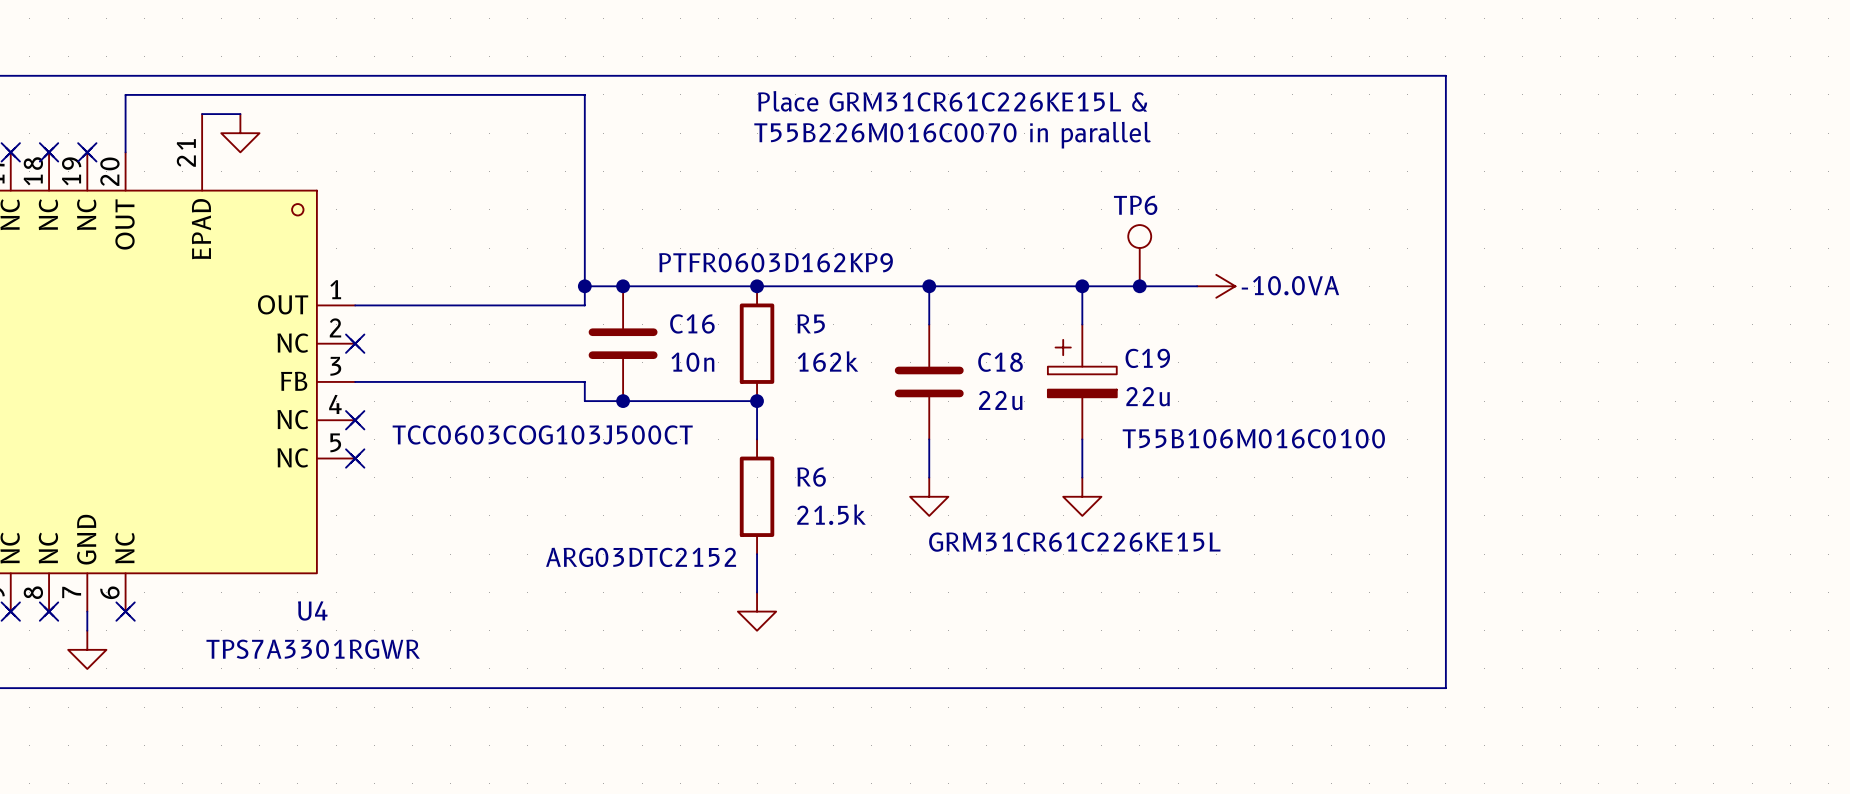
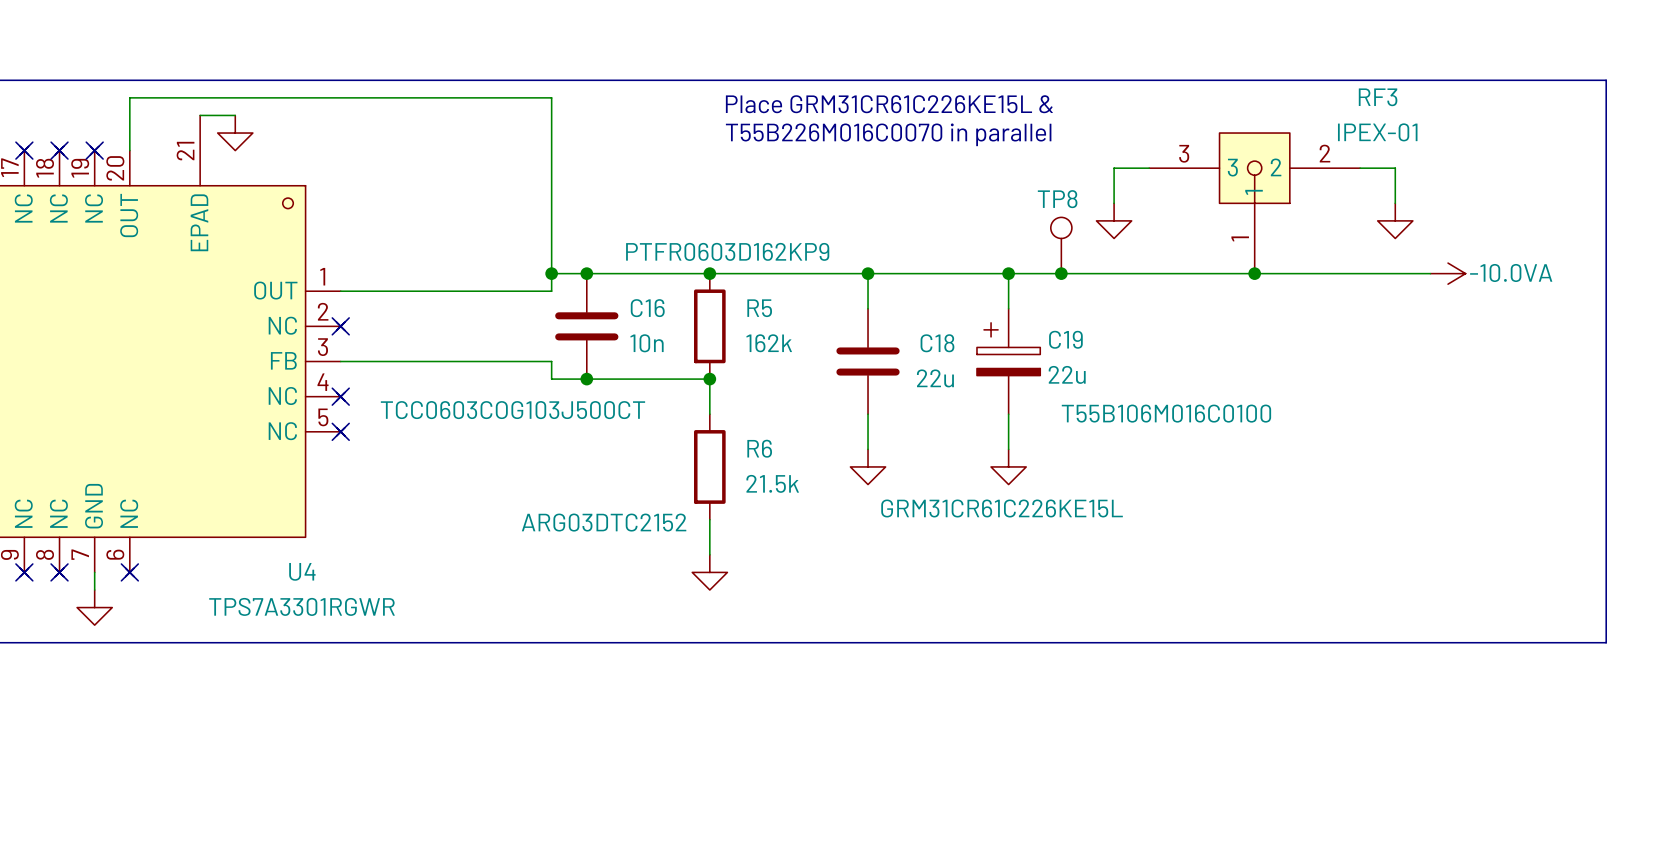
line: (1445, 75) (1445, 688) -> (1342, 80) (1606, 80) (1606, 642) (1342, 642)
wire: none -> (1149, 168) (1114, 168) (1114, 203)
wire: none -> (1360, 168) (1395, 168) (1395, 203)
TP6 name: TP6 (1135, 205) -> TP8 (1057, 199)
RF3: none -> IPEX-01 (1254, 203)
power symbol: none -> (1114, 220)
power symbol: none -> (1395, 220)
wire: none -> (1114, 273) (1430, 273)
power symbol position: -10.0VA (1216, 286) -> -10.0VA (1448, 273)
junction: none -> (1254, 273)

